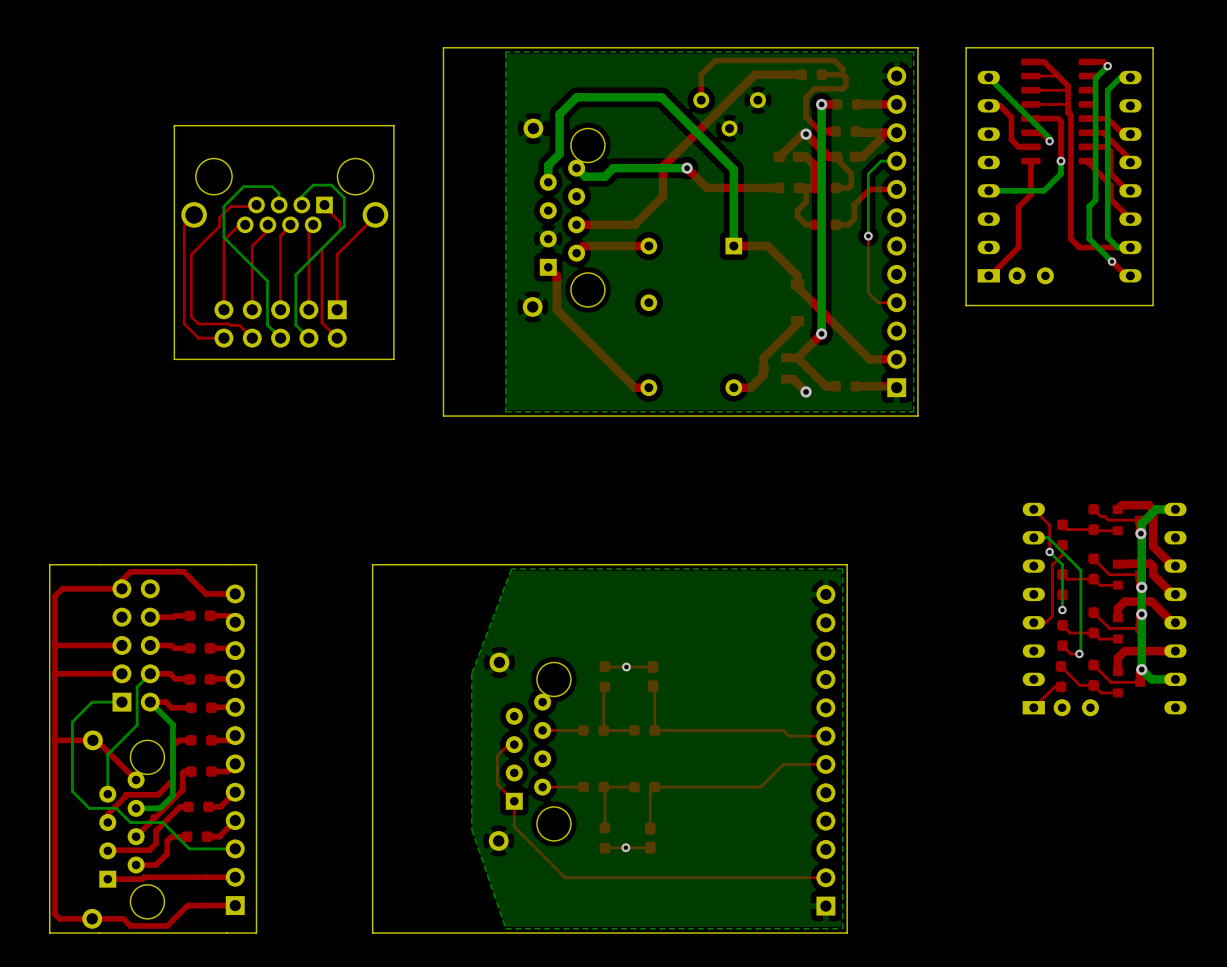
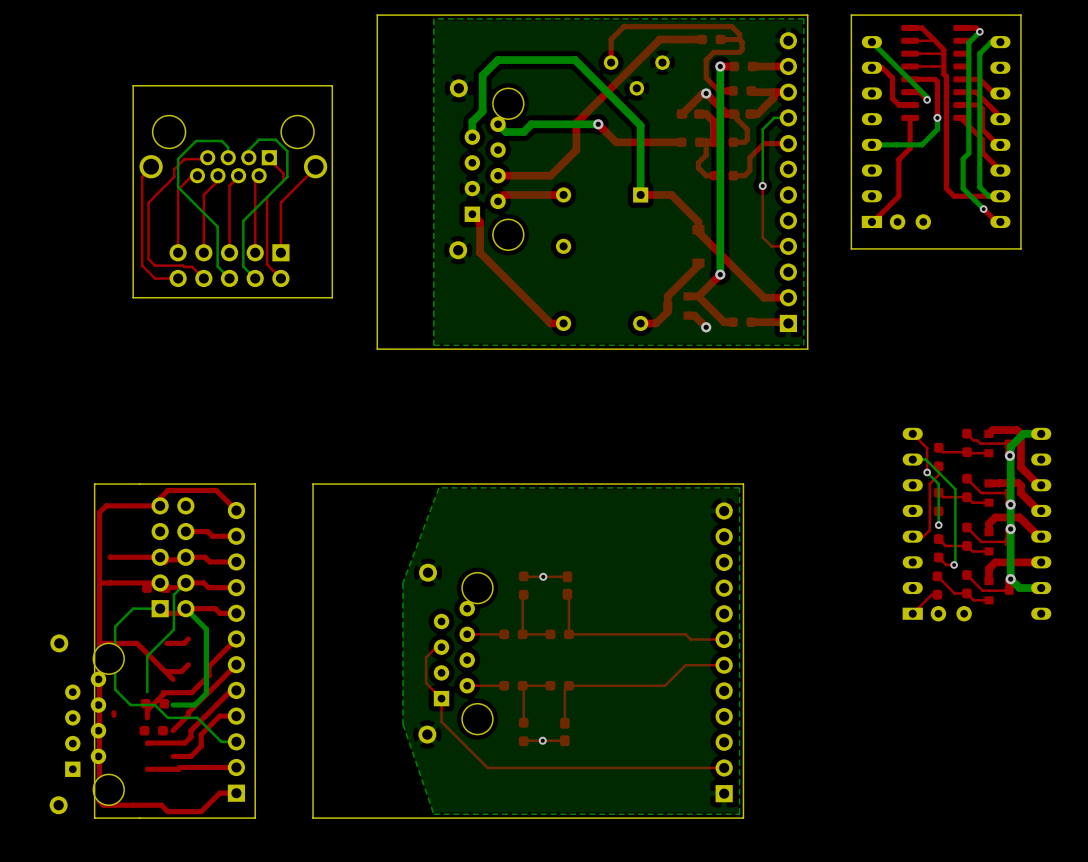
board edge: (131, 564) (49, 564) (49, 933) (131, 933) -> (94, 484) (94, 818)
board edge: (256, 564) (256, 933) -> (207, 484) (255, 484) (255, 818) (207, 818)
top track: (235, 593) (206, 593) (183, 571) (130, 571) (121, 580) (121, 588) (62, 588) (55, 596) (55, 914) (59, 918) (123, 918) (130, 925) (167, 925) (187, 905) (235, 905) -> none
top track: none -> (236, 510) (216, 490) (167, 490) (160, 498) (160, 505) (106, 505) (99, 512) (99, 801) (103, 805) (161, 805) (167, 811) (201, 811) (219, 793) (236, 793)
top track: (189, 615) (150, 617) -> none
part: (199, 615) -> none
top track: (210, 615) (228, 615) (235, 622) -> none
top track: none -> (185, 531) (207, 531) (212, 536) (236, 536)
top track: (55, 645) (121, 645) -> none
part position: (136, 645) -> (173, 557)
top track: (171, 645) (174, 648) (189, 648) -> (130, 557) (160, 557)
top track: none -> (185, 557) (205, 557) (209, 561) (236, 561)
part: (199, 648) -> none
top track: (55, 673) (121, 673) -> none
top track: none -> (99, 582) (111, 582)
bottom track: (150, 673) (137, 686) (137, 725) (107, 754) (107, 794) -> (185, 582) (173, 594) (173, 629) (147, 656) (147, 692)
top track: (170, 673) (175, 678) (189, 679) -> (129, 582) (160, 582)
top track: none -> (185, 582) (203, 582) (208, 587) (236, 587)
bottom track: (121, 702) (92, 702) (72, 721) (72, 791) (89, 808) (116, 808) (130, 822) (163, 822) (189, 848) (235, 848) -> none
top track: (150, 702) (165, 702) (171, 707) (191, 707) -> none
bottom track: (150, 702) (172, 724) (172, 795) (160, 808) (136, 808) -> (185, 608) (206, 629) (206, 693) (194, 705) (173, 705)
bottom track: none -> (160, 608) (133, 608) (115, 626) (115, 689) (130, 705) (155, 705) (167, 717) (197, 717) (221, 741) (236, 741)
top track: none -> (185, 608) (215, 608) (220, 613) (236, 613)
part: (201, 707) -> none
top track: none -> (236, 639) (208, 666) (208, 675) (191, 692) (163, 692) (147, 710) (147, 717)
top track: (191, 740) (178, 740) (172, 746) (172, 780) (158, 794) (125, 794) (107, 814) (107, 822) -> none
part: (201, 740) -> none
top track: (55, 742) (56, 740) (96, 740) (136, 780) -> (99, 644) (101, 643) (137, 643) (173, 679)
part position: (235, 749) -> (236, 651)
top track: none -> (236, 664) (173, 730)
top track: (191, 771) (182, 772) (182, 789) (136, 836) -> none
part: (201, 771) -> none
top track: (235, 792) (220, 806) (208, 806) -> none
top track: none -> (236, 690) (231, 690) (190, 730) (190, 737) (185, 743) (147, 743)
top track: (188, 806) (180, 806) (155, 831) (155, 843) (149, 850) (107, 850) -> none
top track: (235, 820) (219, 836) (207, 836) -> none
top track: none -> (236, 716) (219, 716) (201, 734) (201, 746) (190, 756) (173, 756)
top track: (186, 836) (171, 836) (167, 840) (167, 853) (155, 865) (136, 865) -> none
top track: (226, 877) (107, 879) -> (180, 767) (178, 769) (147, 769)
top track: none -> (236, 767) (188, 767)

